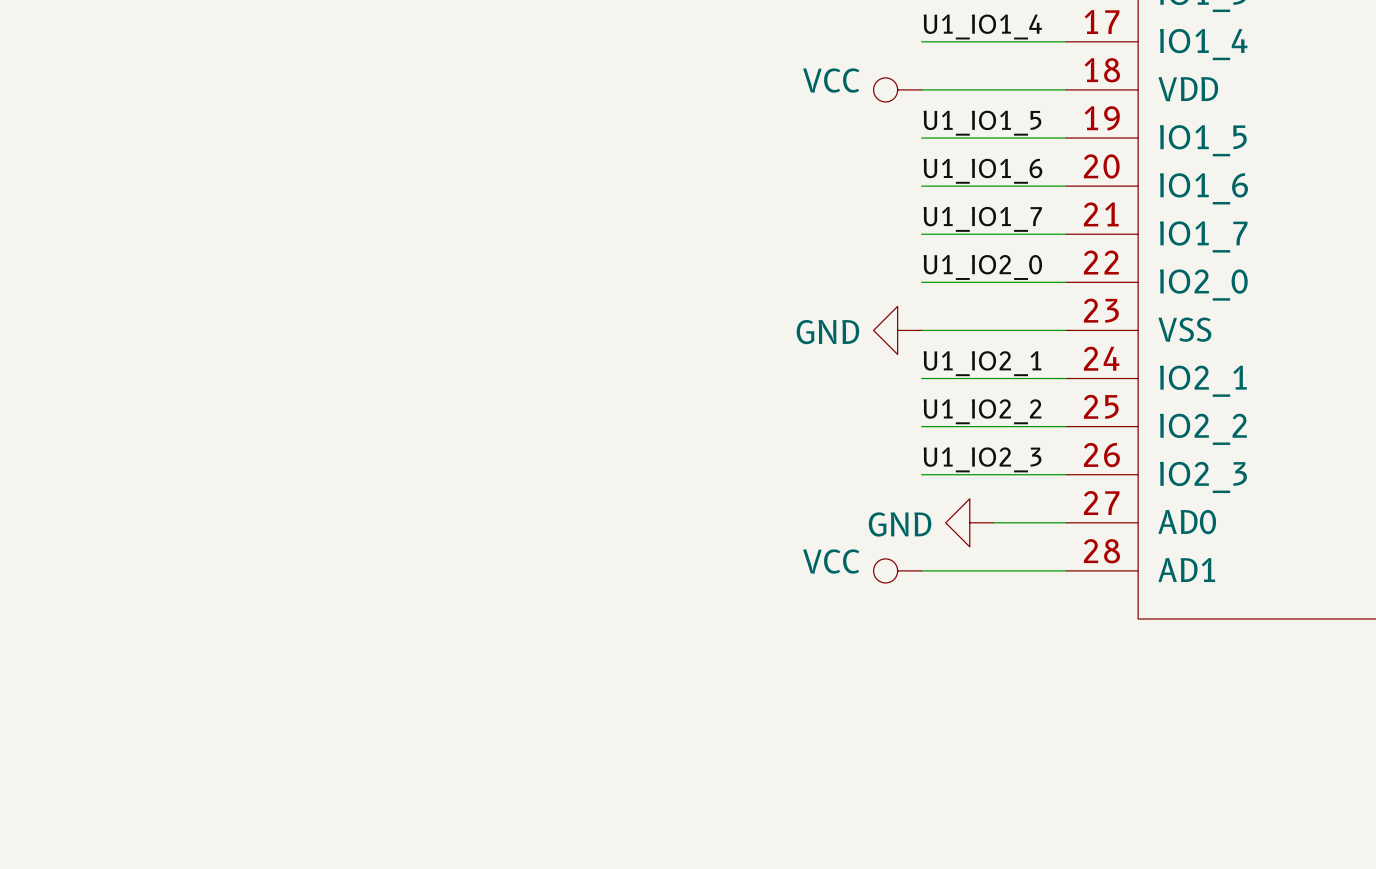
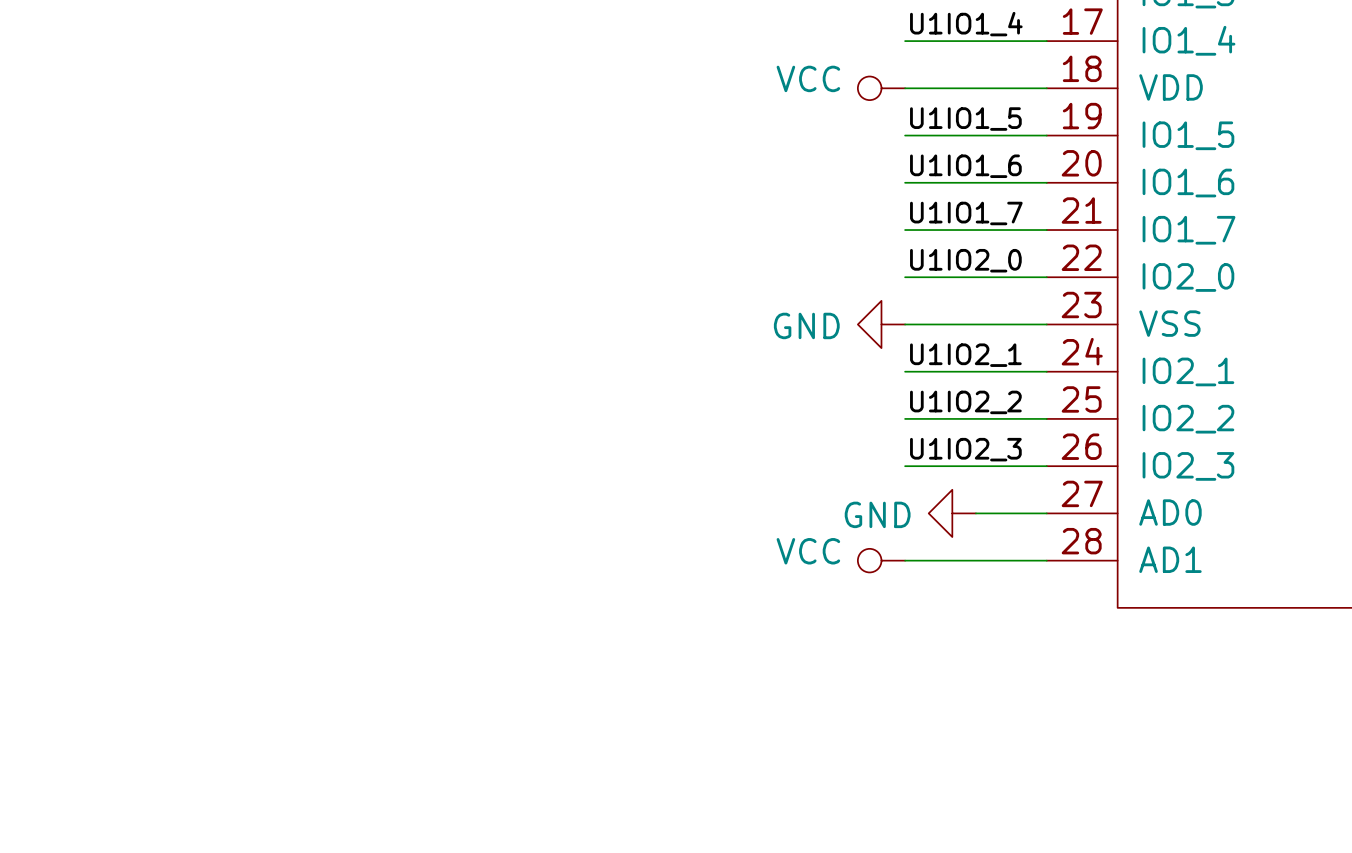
label: U1_IO1_4 (982, 26) -> U1IO1_4 (966, 24)
label: U1_IO1_5 (982, 123) -> U1IO1_5 (965, 119)
label: U1_IO1_6 (982, 171) -> U1IO1_6 (965, 166)
label: U1_IO1_7 (982, 219) -> U1IO1_7 (966, 213)
label: U1_IO2_0 (982, 267) -> U1IO2_0 (965, 260)
label: U1_IO2_1 (982, 363) -> U1IO2_1 (965, 355)
label: U1_IO2_2 (982, 411) -> U1IO2_2 (965, 402)
label: U1_IO2_3 (982, 459) -> U1IO2_3 (965, 449)

